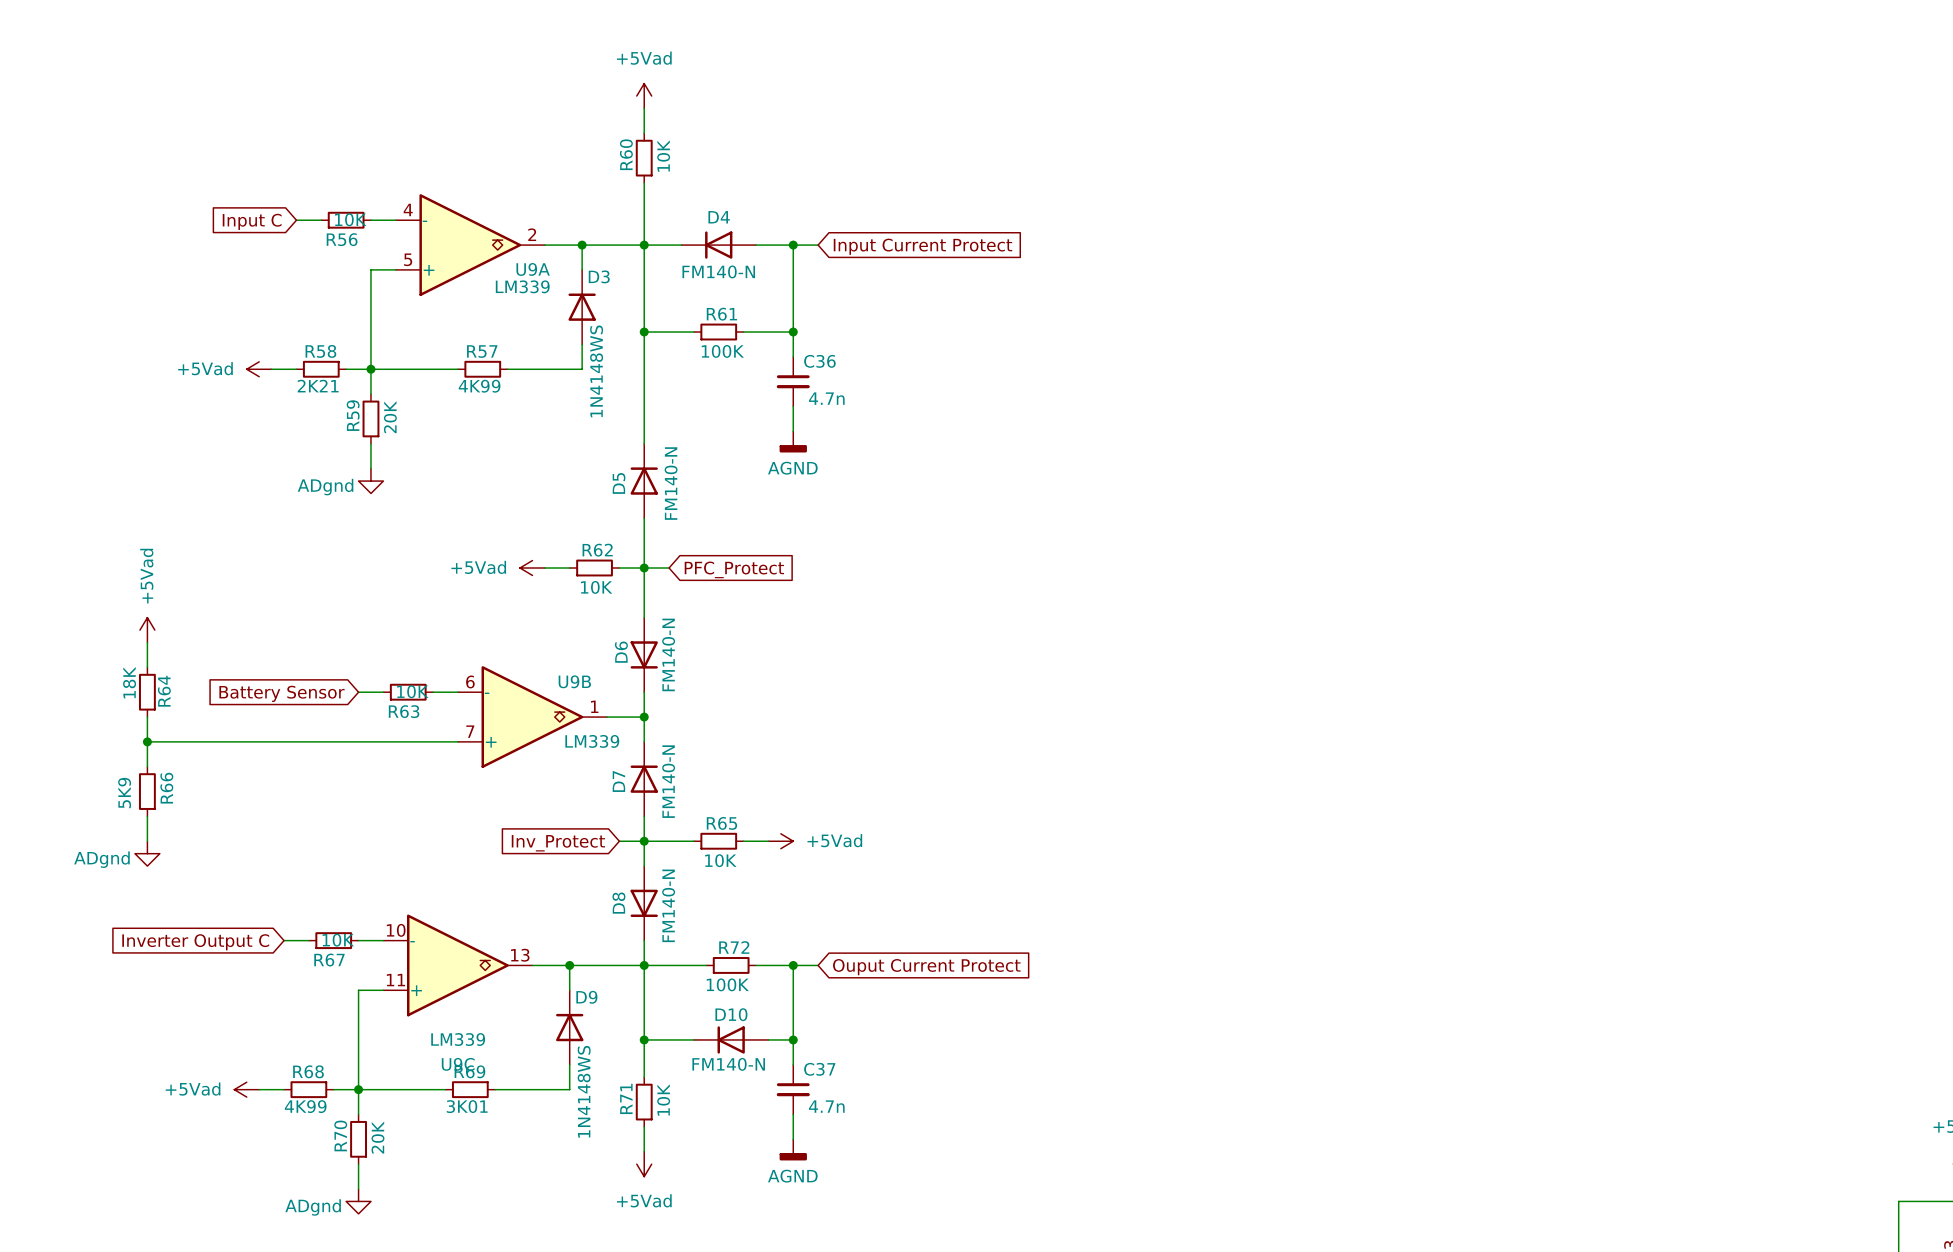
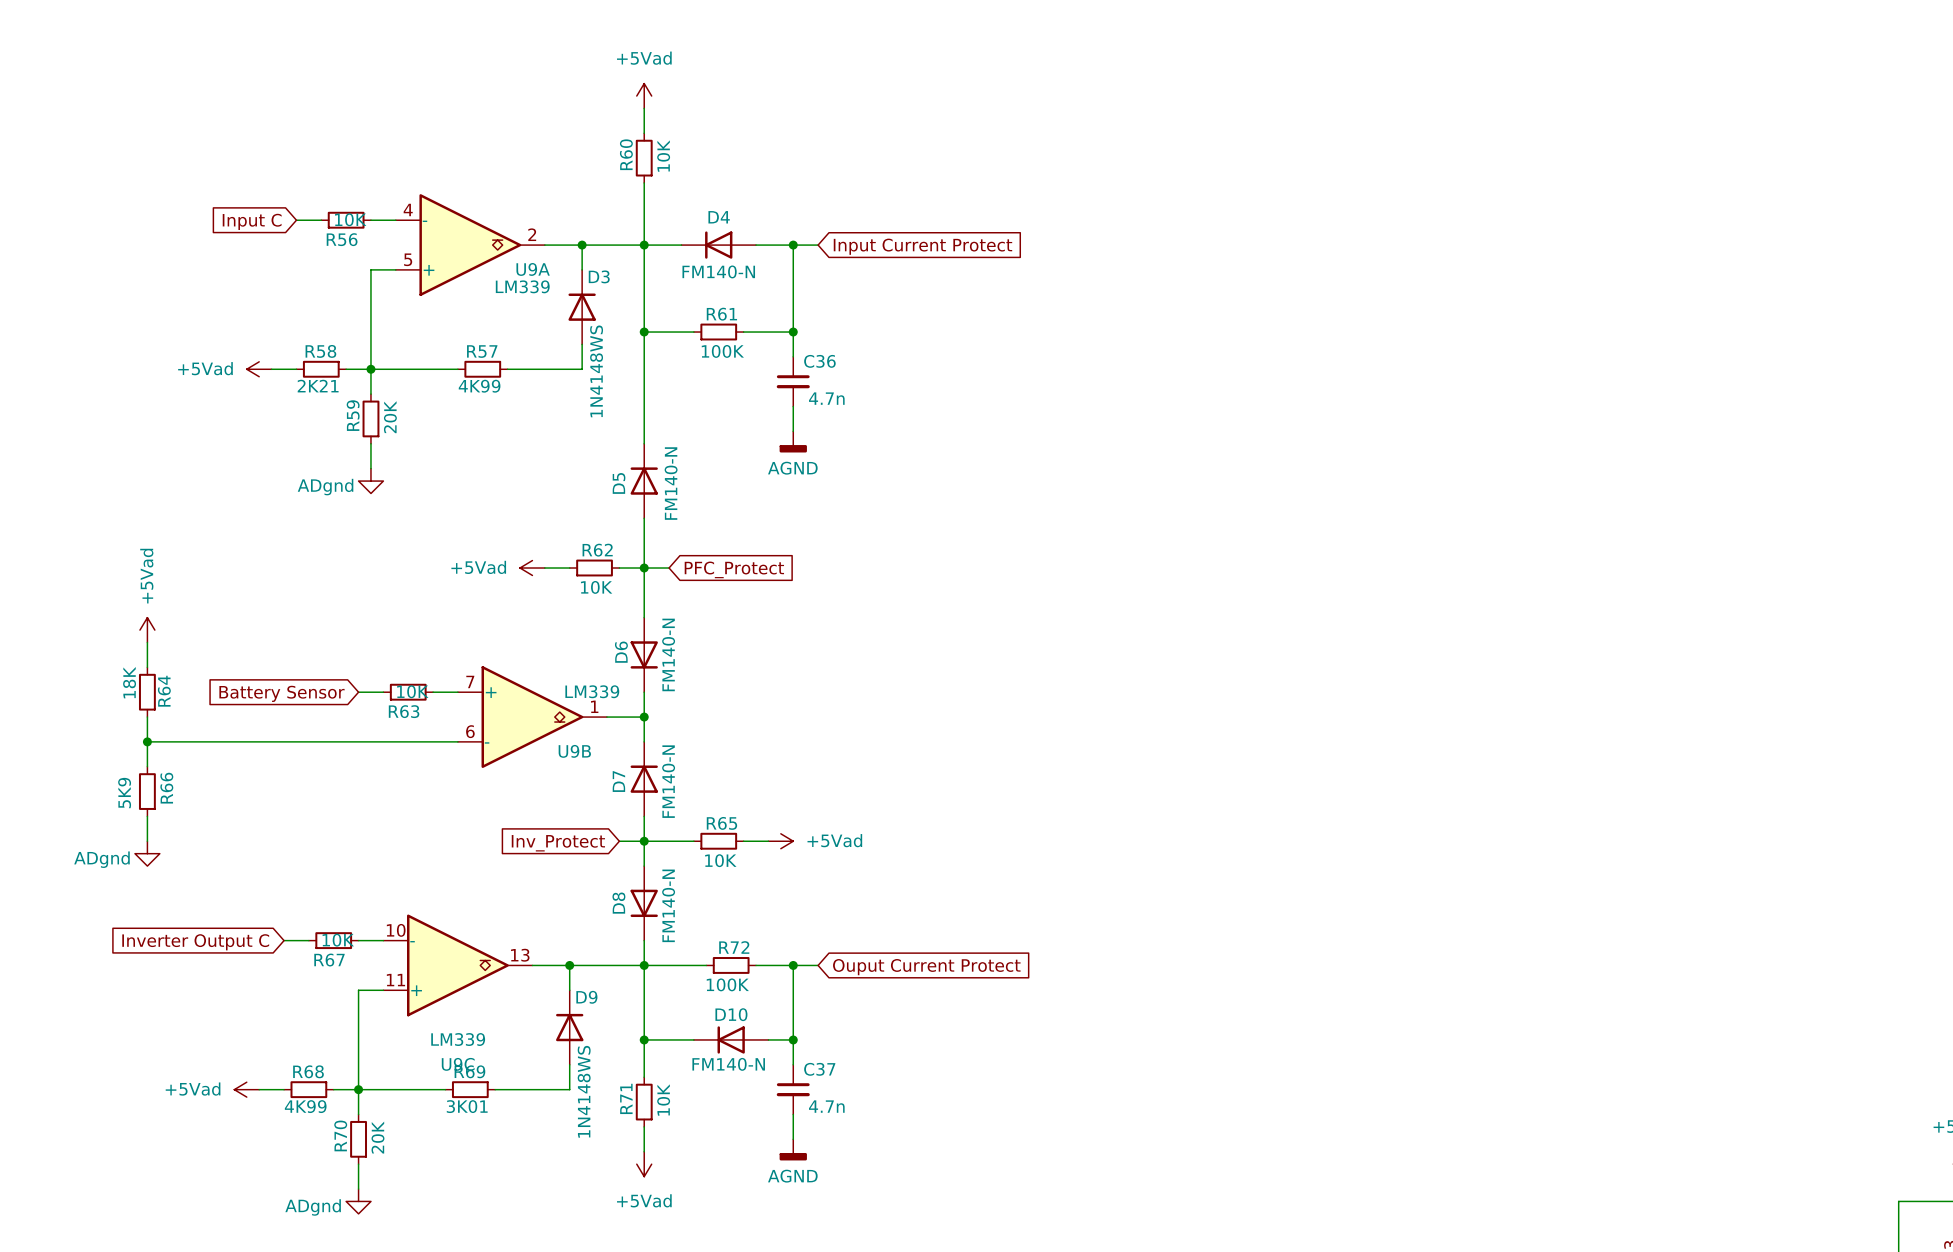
U9B flip: as is (532, 717) -> up-down (532, 717)

